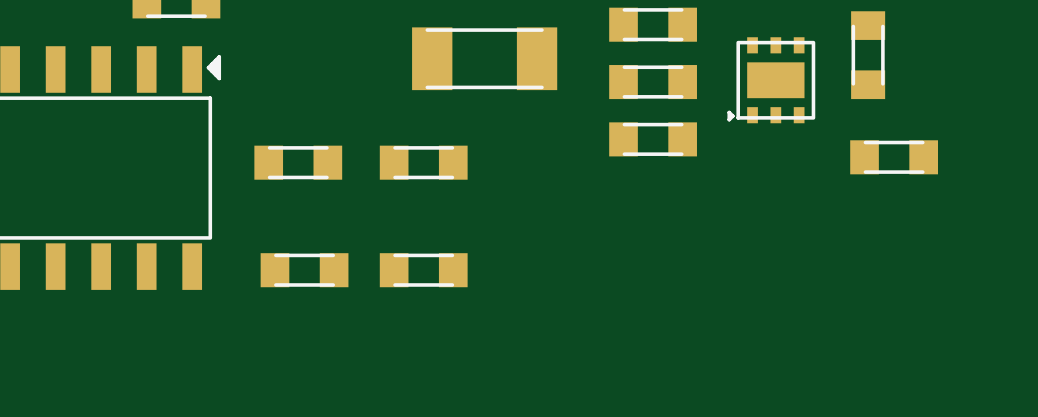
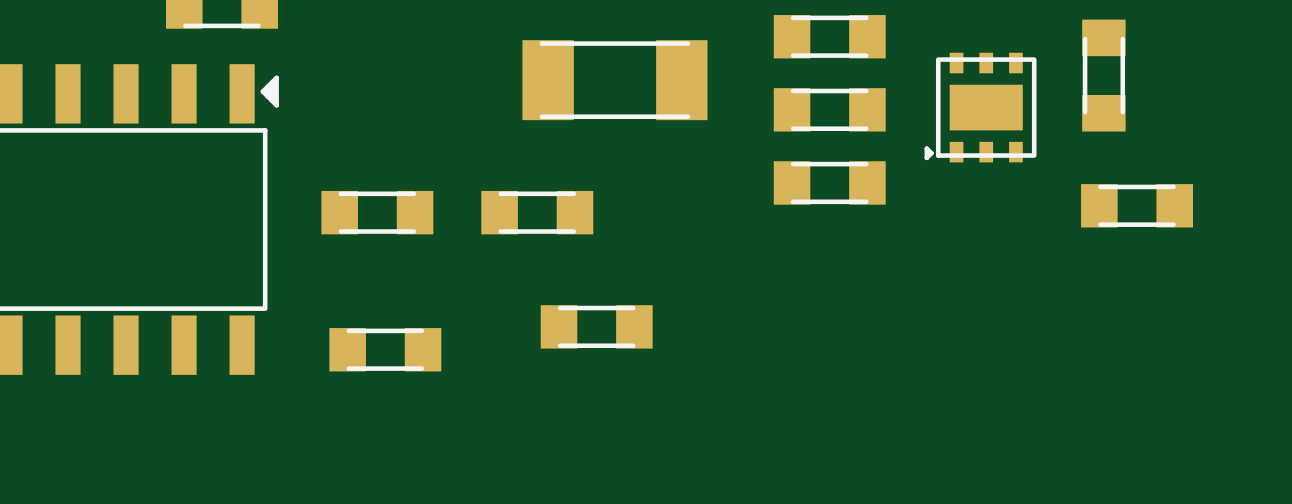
part position: (423, 270) -> (596, 326)

